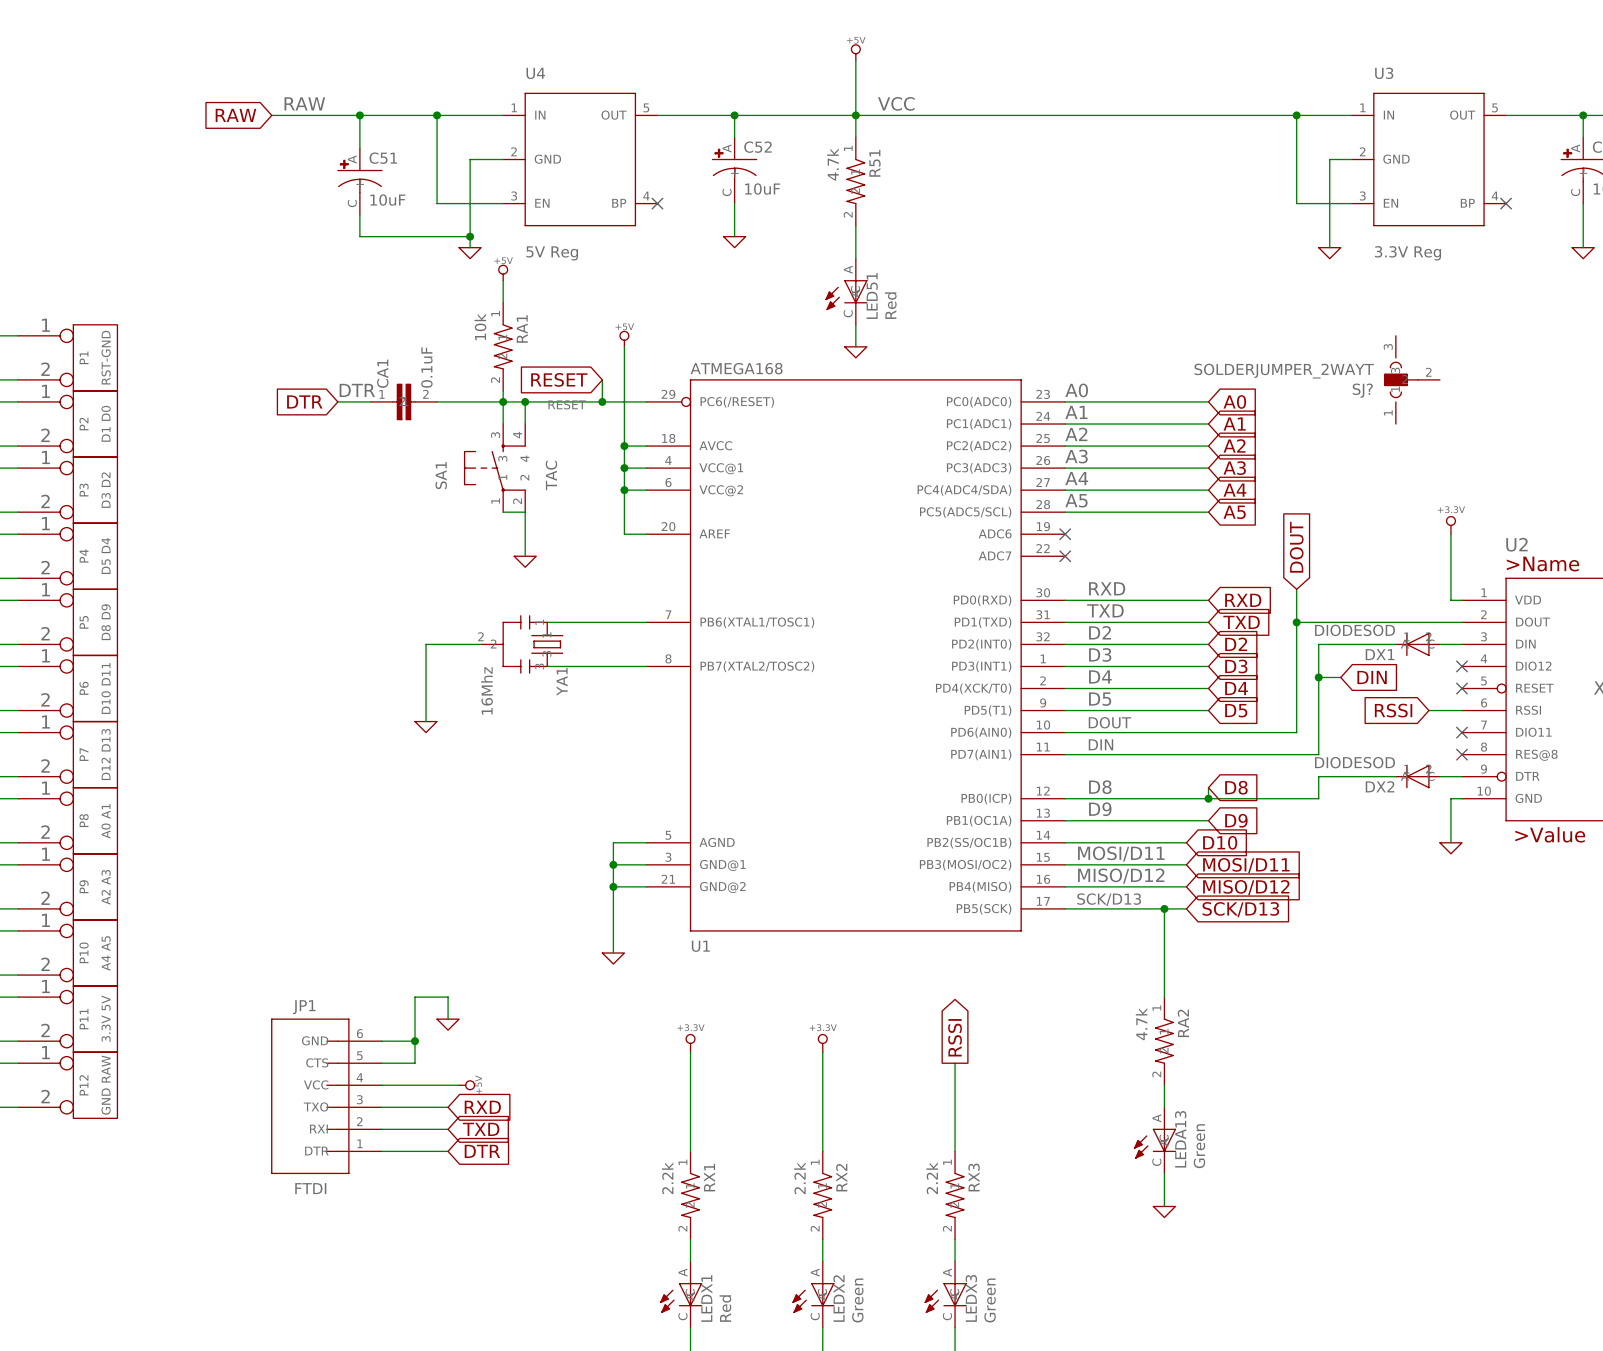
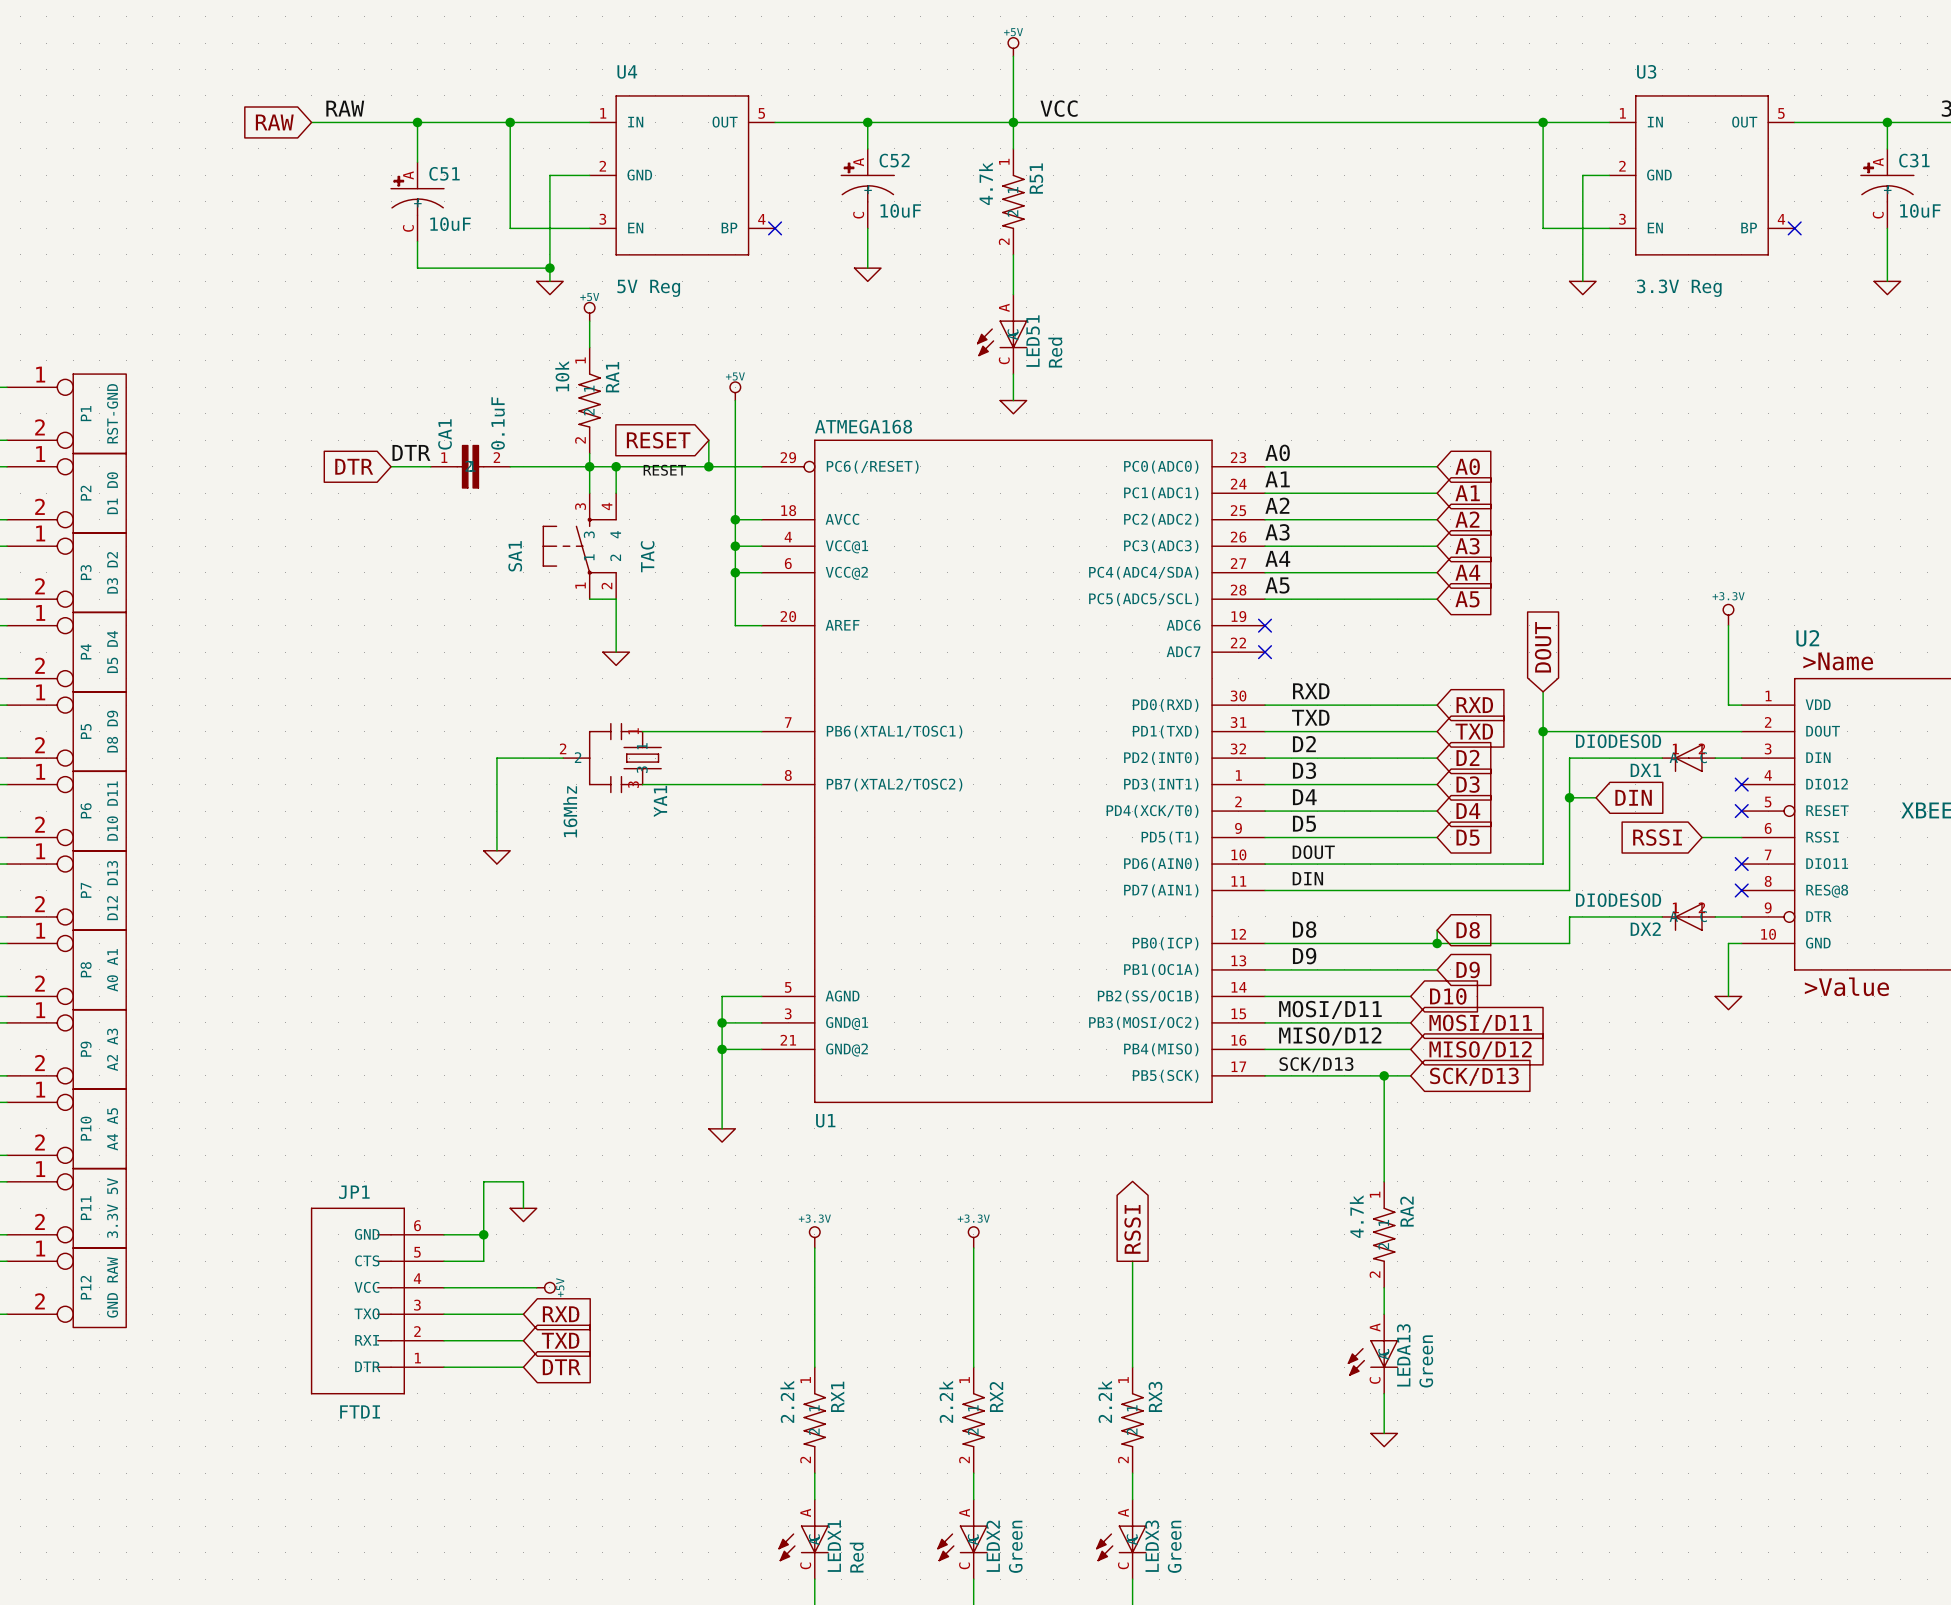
SJ?: SOLDERJUMPER_2WAYT (1412, 379) -> none

